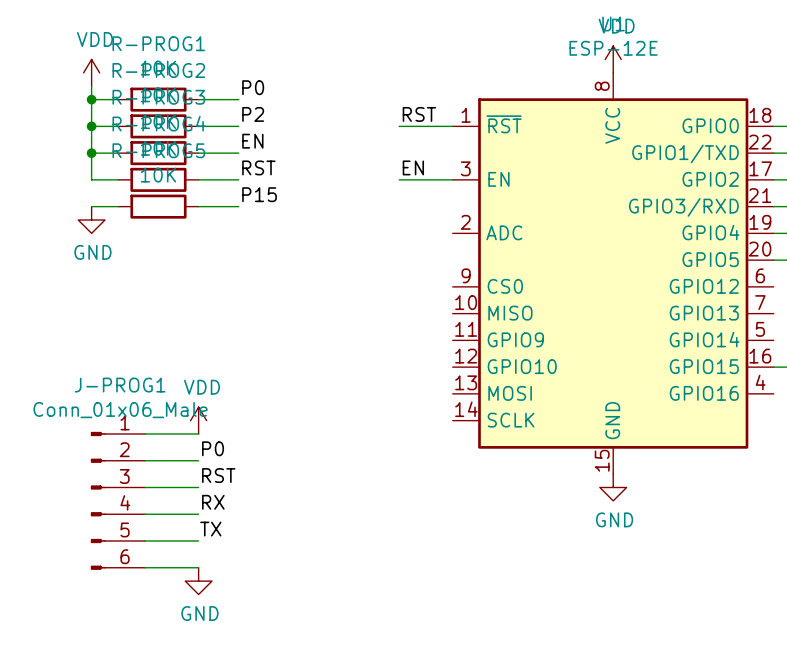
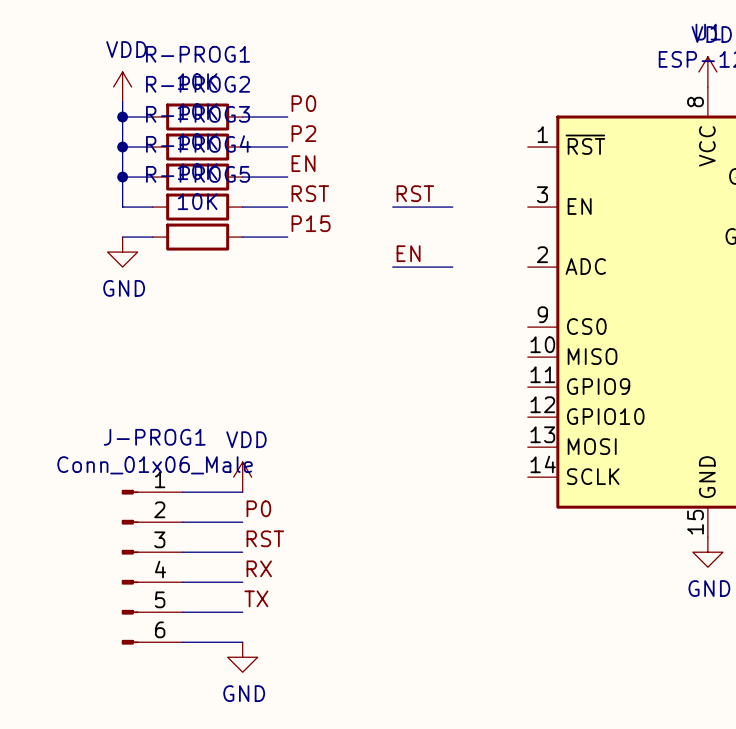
label position: RST (419, 114) -> RST (415, 193)
wire: (399, 126) (452, 126) -> (392, 207) (452, 207)
label position: EN (413, 167) -> EN (408, 253)
wire: (399, 179) (452, 179) -> (392, 267) (452, 267)

